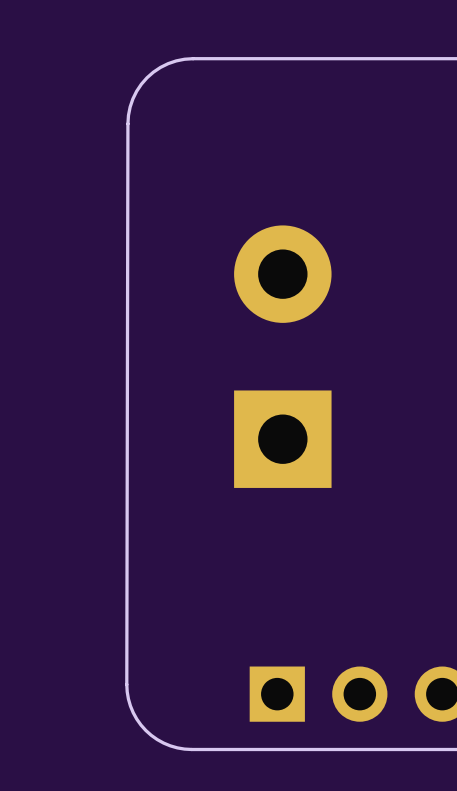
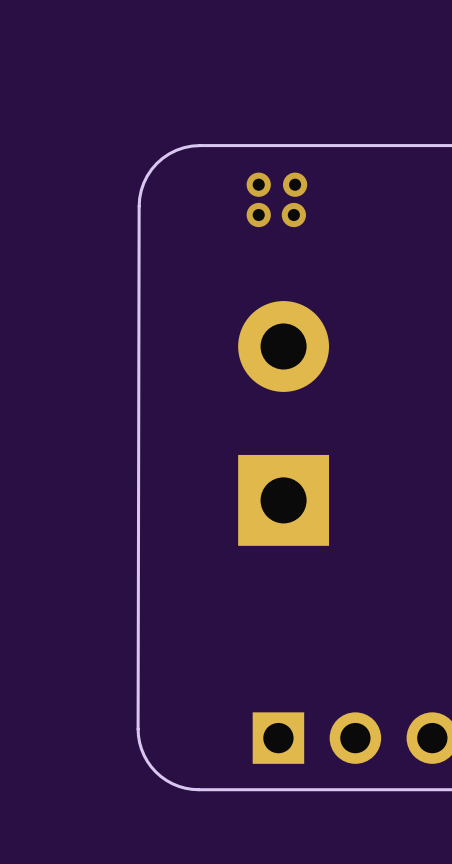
via: none -> (258, 184)
via: none -> (295, 184)
via: none -> (258, 215)
via: none -> (293, 215)

